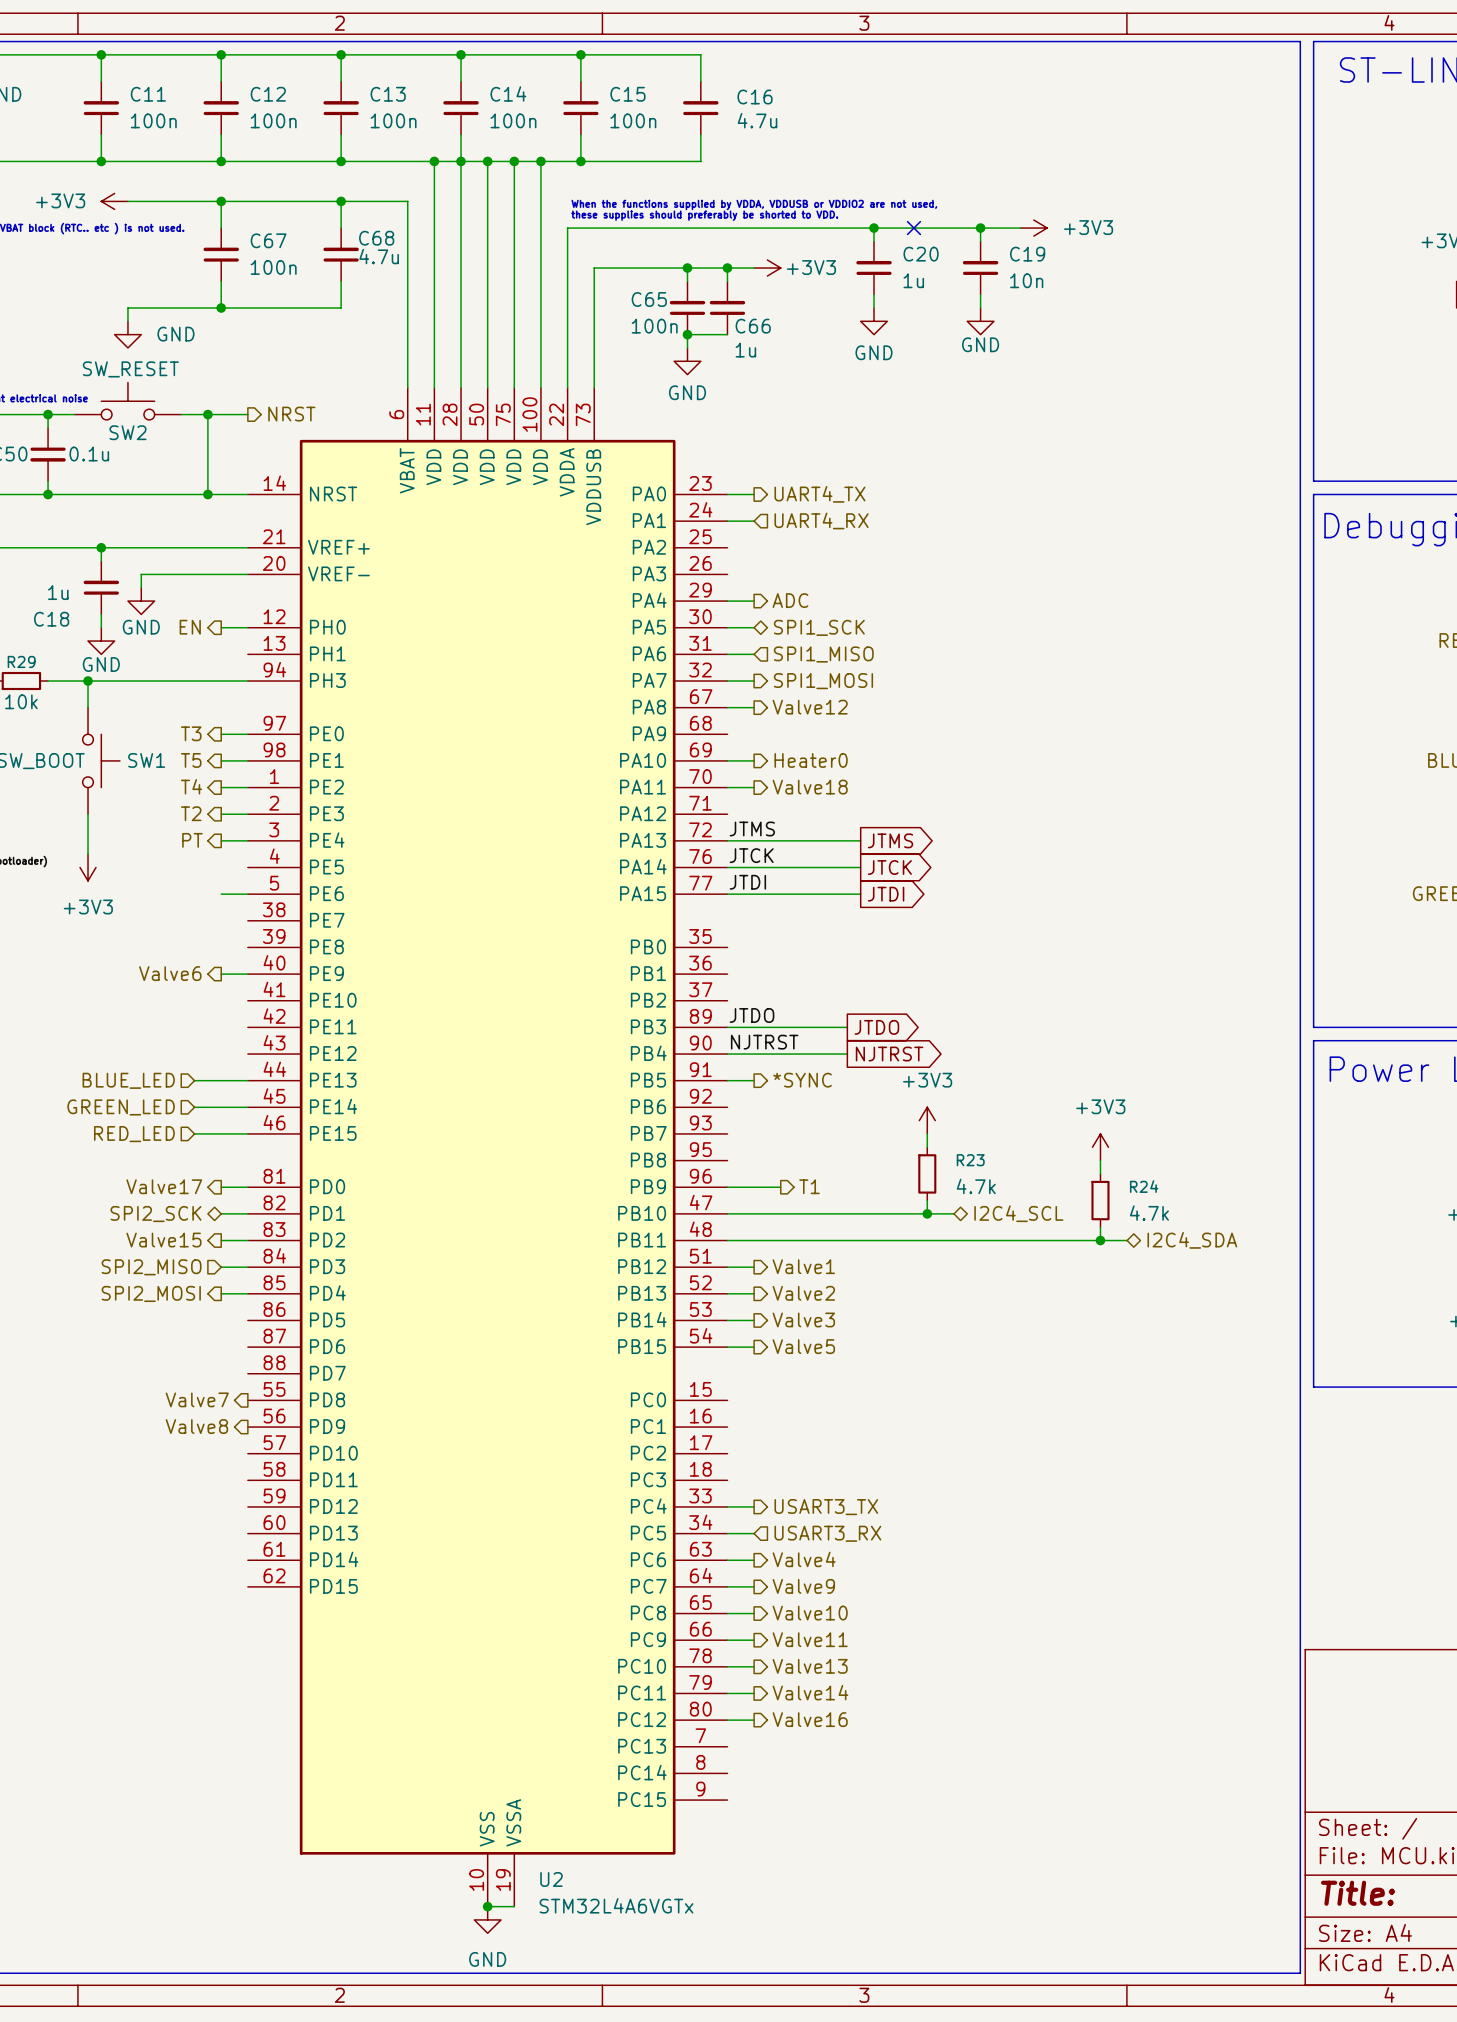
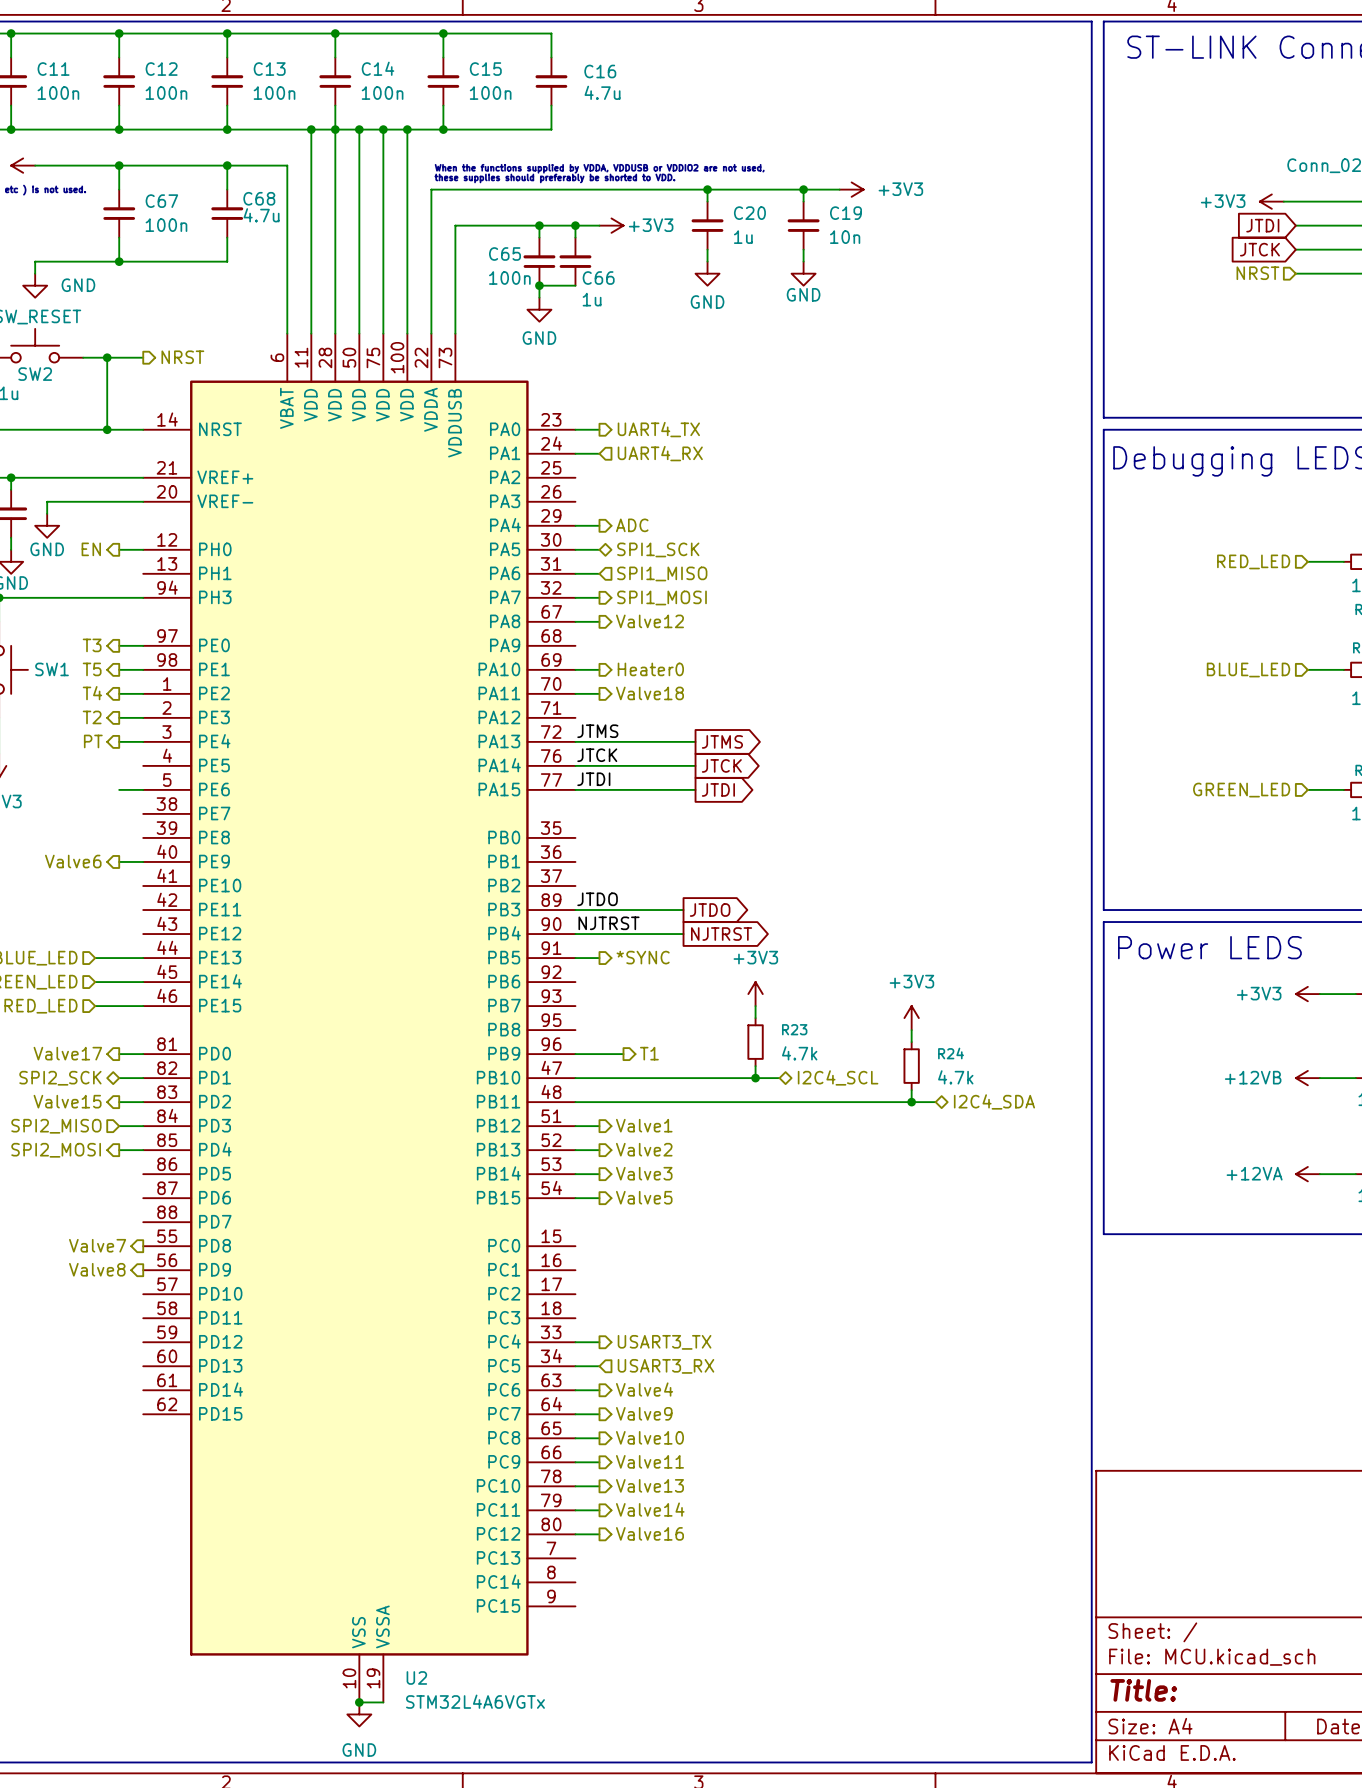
no-connect mark: (913, 228) -> none

